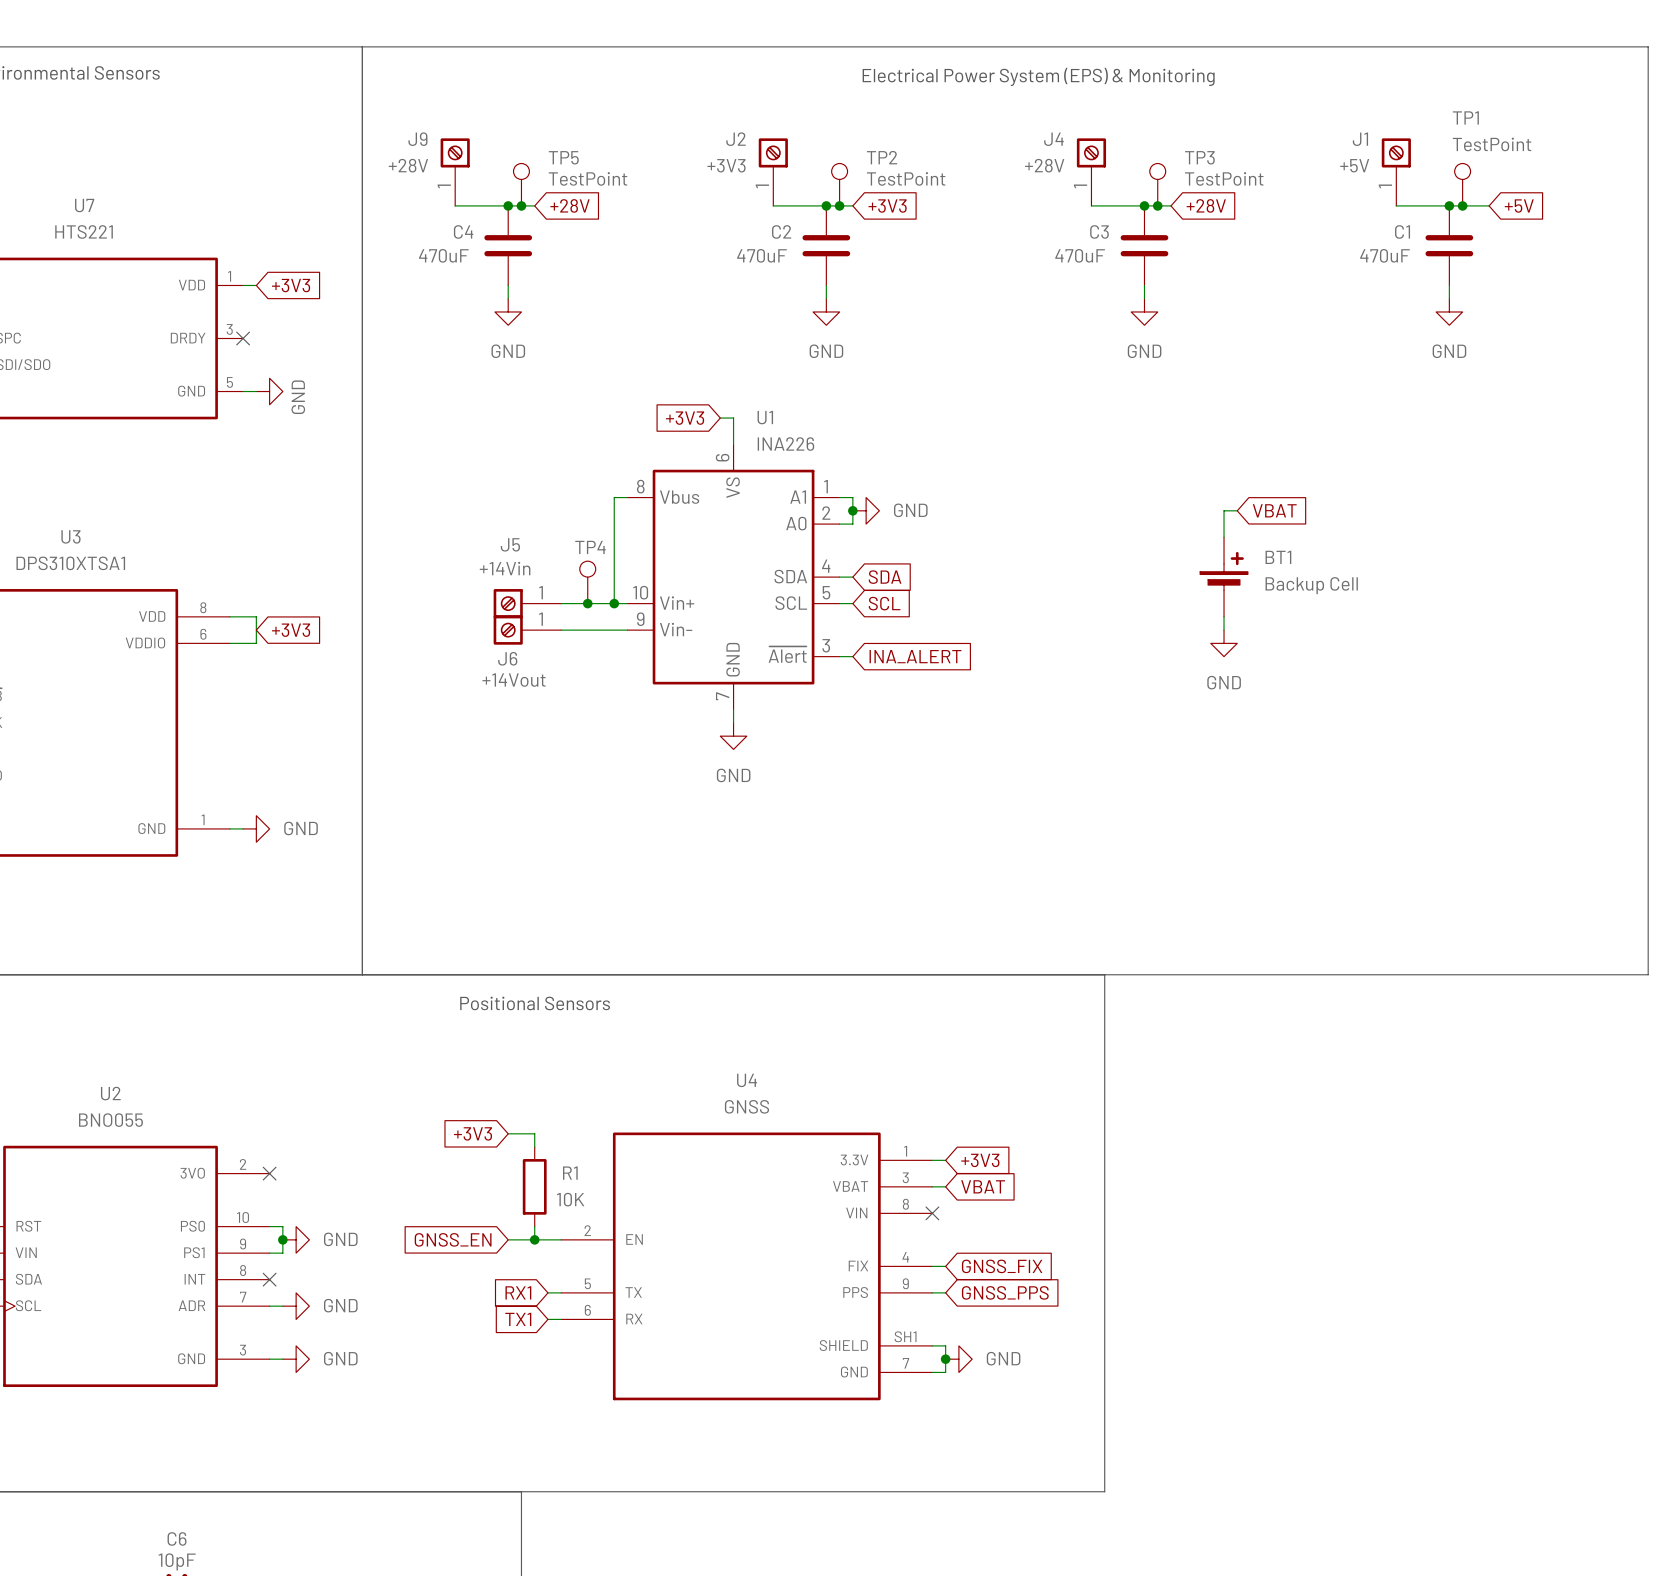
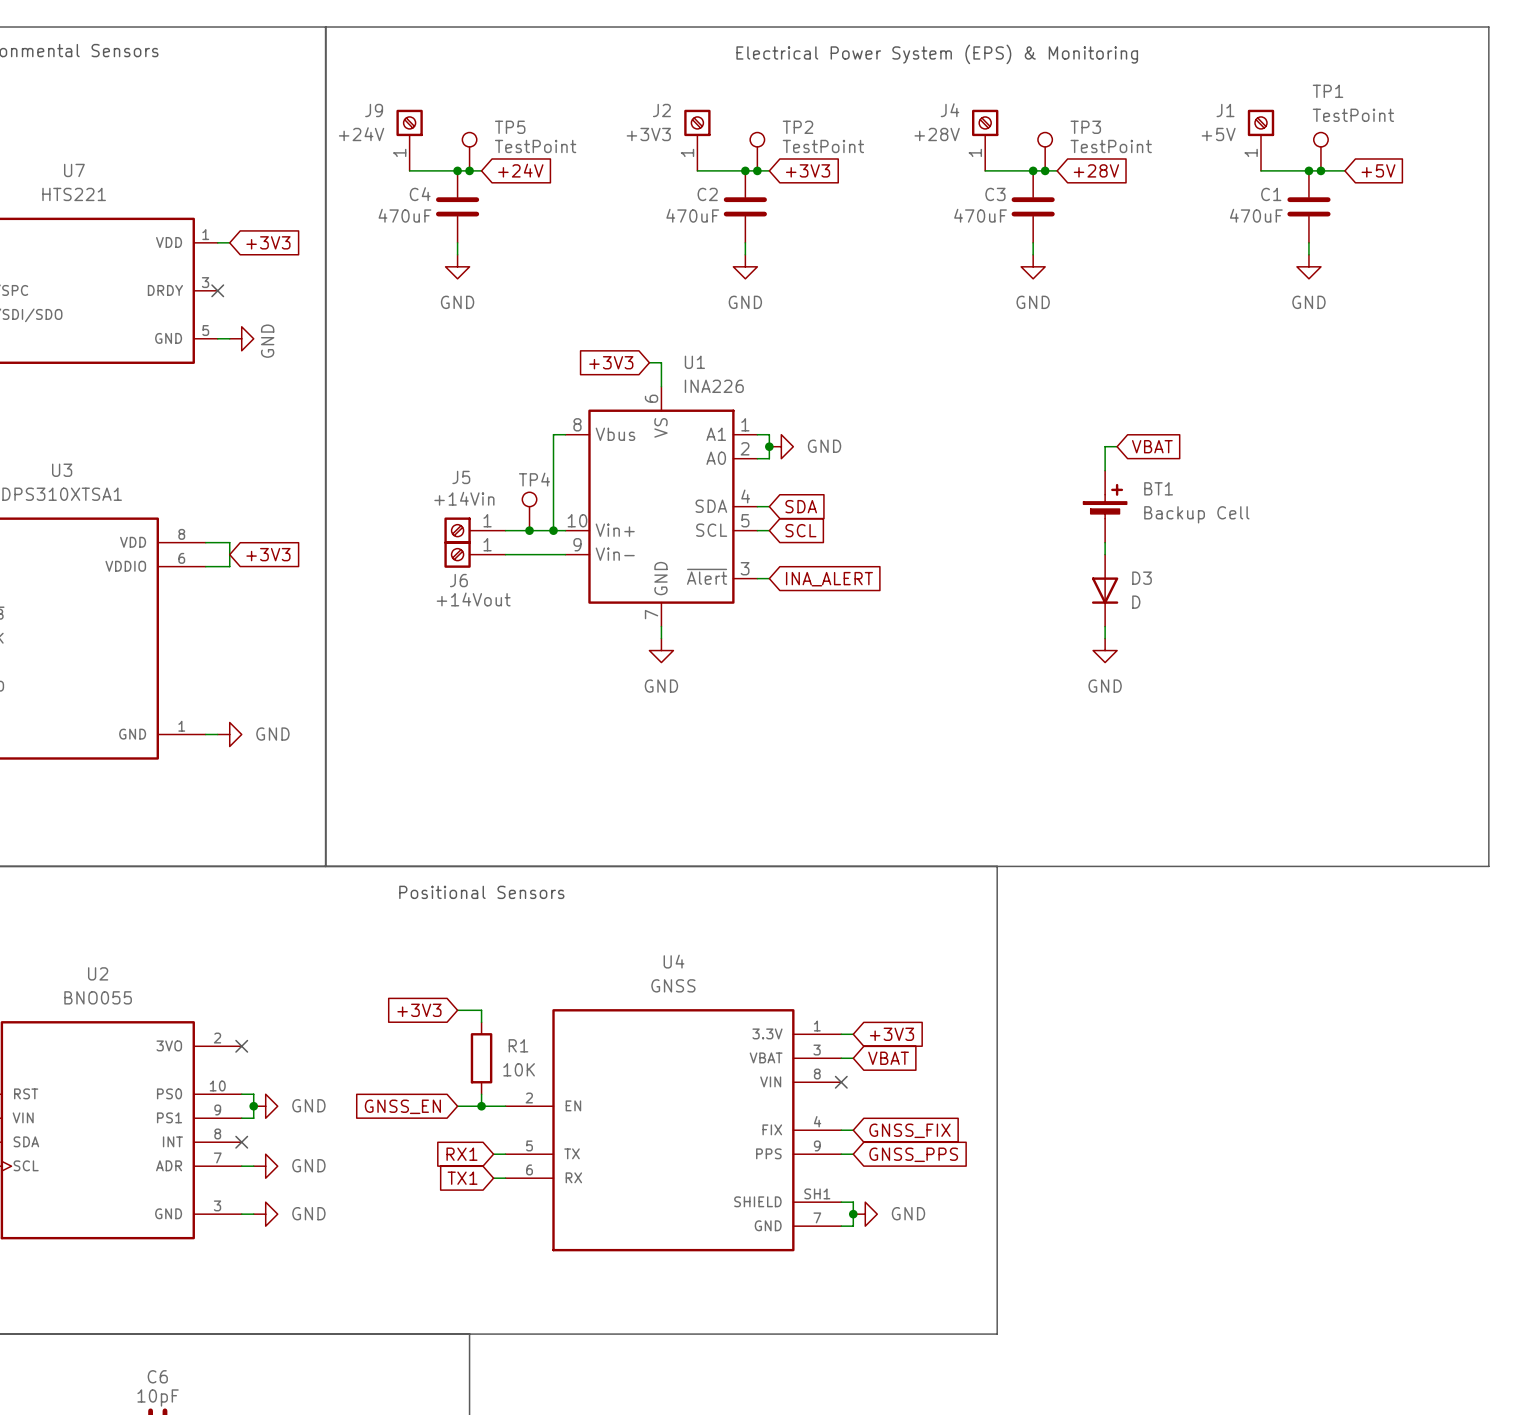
J9 value: +28V (408, 165) -> +24V (361, 134)
global label: +28V (570, 205) -> +24V (520, 170)
power symbol position: GND (1224, 643) -> GND (1105, 650)
D3: none -> D (1105, 590)
wire: none -> (1105, 626) (1105, 638)

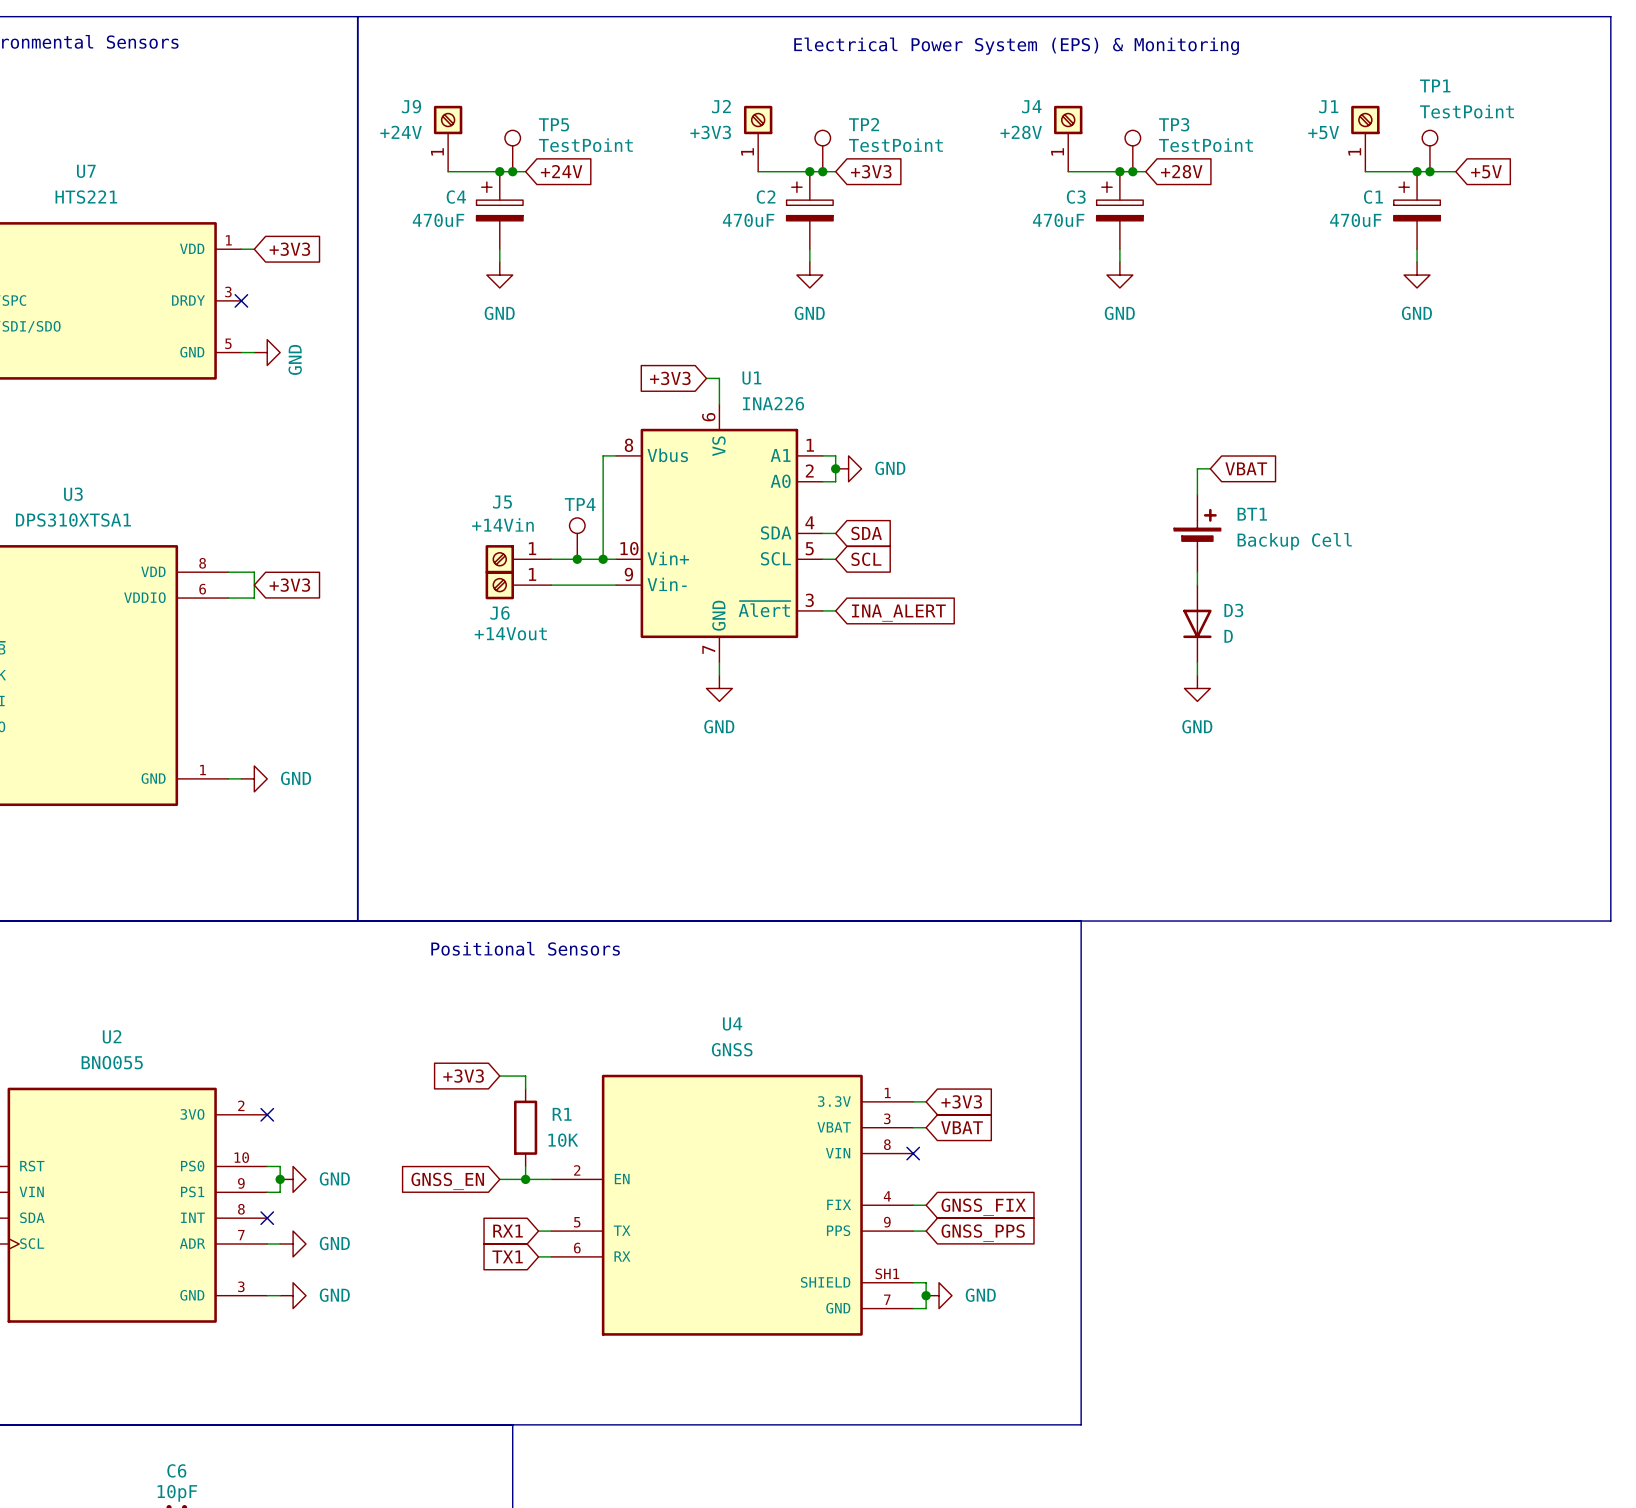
C4 symbol: [435, 170, 480, 243] -> [476, 171, 524, 250]
C2 symbol: [723, 170, 767, 243] -> [786, 171, 834, 250]
C3 symbol: [1011, 170, 1055, 243] -> [1096, 171, 1144, 250]
C1 symbol: [1287, 170, 1331, 243] -> [1393, 171, 1441, 250]

